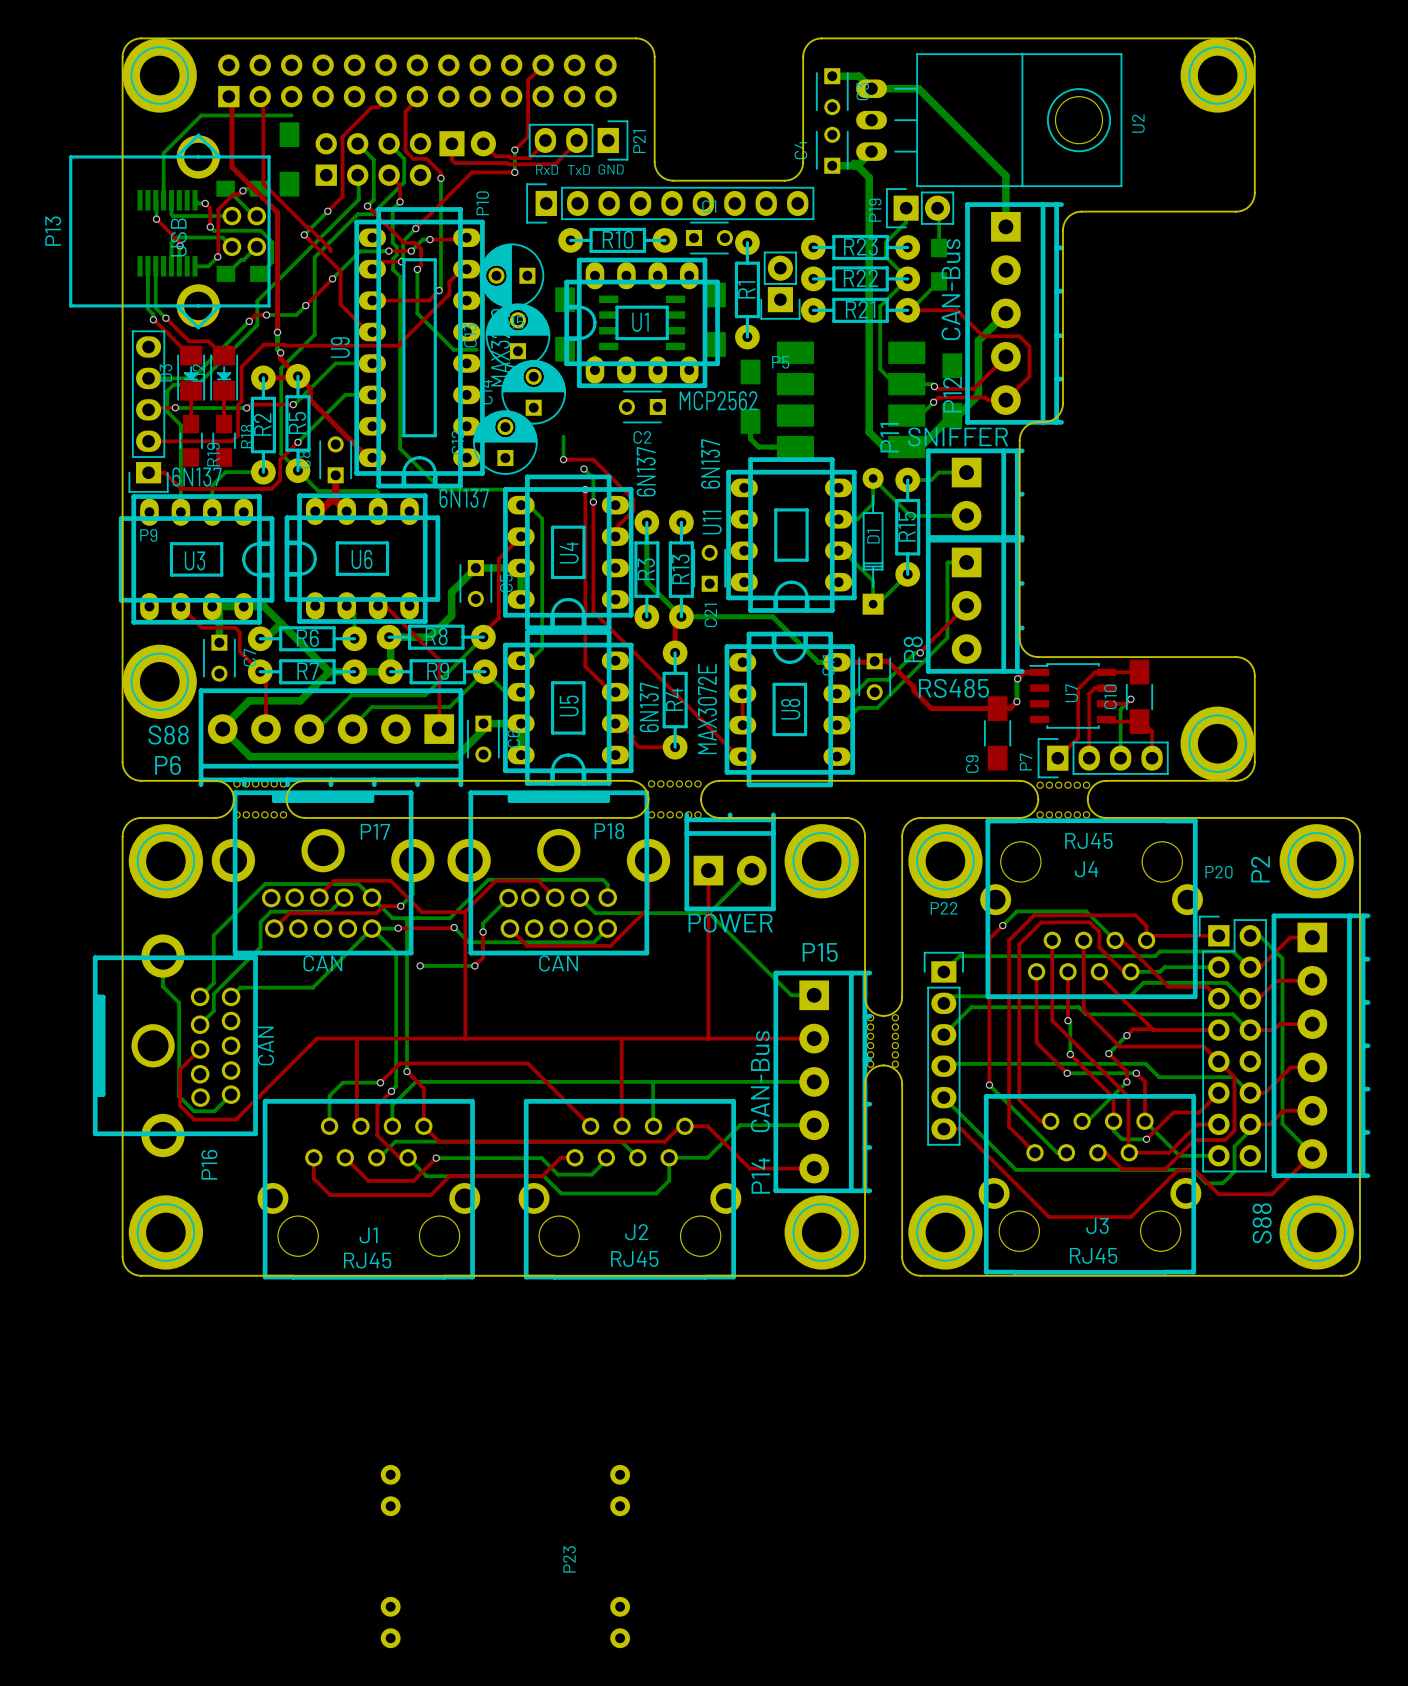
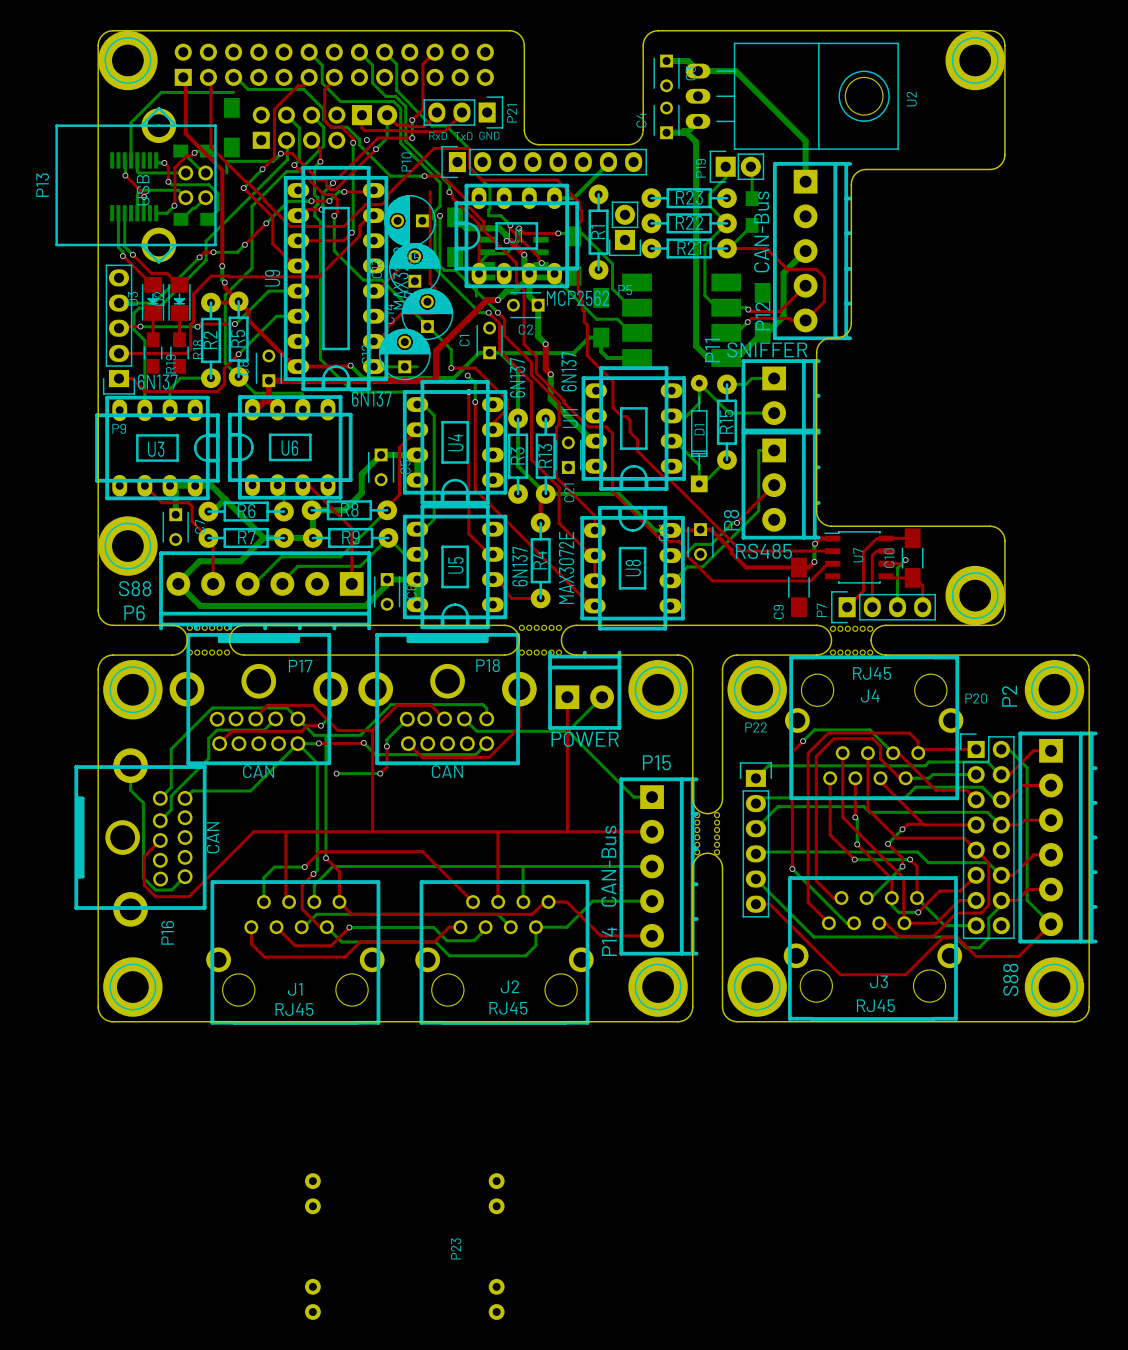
bottom track: none -> (309, 52) (322, 65) (322, 83) (340, 101) (393, 101) (400, 108) (400, 143) (440, 182) (440, 206) (433, 212) (435, 268) (479, 312) (488, 312)
bottom track: none -> (359, 52) (372, 65) (372, 83) (385, 96) (395, 96) (405, 106) (405, 141) (449, 184) (449, 192)
bottom track: none -> (384, 52) (396, 64) (396, 90) (431, 126) (446, 126) (469, 149) (469, 167) (489, 187) (488, 215) (500, 215) (510, 225)
bottom track: none -> (236, 77) (248, 89) (303, 89) (323, 109) (323, 119) (331, 127) (347, 127) (359, 139) (359, 145) (390, 176) (424, 176)
bottom track: none -> (387, 115) (387, 138) (375, 149)
via: none -> (366, 140)
P10 footprint: [526, 183, 815, 224] -> [441, 145, 647, 179]
top track: none -> (375, 149) (335, 189) (329, 189) (326, 186) (326, 179) (318, 179) (292, 153) (280, 153)
via: none -> (375, 149)
bottom track: none -> (280, 153) (273, 161) (227, 161) (226, 173)
via: none -> (280, 153)
bottom track: none -> (608, 162) (573, 198) (554, 198)
top track: none -> (424, 176) (442, 176) (468, 201) (468, 206) (484, 222) (484, 230) (516, 263) (516, 282) (524, 290) (524, 344) (536, 356) (536, 373) (588, 426) (605, 426) (612, 433) (612, 491) (662, 541) (678, 541) (684, 547) (684, 553) (712, 580) (810, 580) (827, 563)
via: none -> (424, 176)
C1 rotation: 0° (709, 238) -> 90° counterclockwise (489, 340)
C1 position: (709, 238) -> (489, 340)
top track: none -> (430, 191) (430, 283) (435, 288)
top track: none -> (449, 192) (479, 224) (479, 273)
via: none -> (449, 192)
R10: (617, 240) -> none
top track: none -> (264, 200) (290, 226) (343, 226) (365, 204) (381, 204) (388, 198) (388, 194) (433, 148) (468, 148) (469, 167) (482, 180) (557, 180) (579, 202) (579, 208) (581, 210) (581, 220) (578, 223) (578, 289) (584, 311) (584, 322) (587, 325) (587, 355) (612, 381) (612, 407) (621, 416) (626, 416) (630, 420) (630, 432) (637, 439) (637, 451) (663, 477) (667, 477) (741, 551) (832, 551)
bottom track: none -> (440, 215) (440, 266) (444, 270) (455, 270) (497, 312)
via: none -> (440, 215)
bottom track: none -> (455, 217) (466, 228) (499, 228) (506, 235) (506, 240)
top track: none -> (510, 225) (510, 228) (538, 257) (541, 262)
via: none -> (510, 225)
bottom track: none -> (519, 228) (519, 240) (506, 253) (488, 253) (479, 263) (479, 273)
top track: none -> (519, 228) (524, 233) (558, 233)
via: none -> (519, 228)
bottom track: none -> (558, 233) (581, 233) (612, 264) (612, 289) (631, 307)
via: none -> (558, 233)
top track: none -> (506, 240) (510, 240) (524, 254)
via: none -> (506, 240)
bottom track: none -> (524, 254) (524, 268) (529, 273) (529, 296) (538, 305) (538, 336) (545, 344)
via: none -> (524, 254)
U1 position: (642, 322) -> (516, 235)
part position: (565, 324) -> (455, 237)
top track: none -> (414, 262) (405, 262) (377, 291)
bottom track: none -> (541, 262) (554, 273) (554, 277) (596, 319) (617, 319) (631, 332)
via: none -> (541, 262)
bottom track: none -> (529, 277) (514, 291) (506, 291) (497, 300)
bottom track: none -> (381, 280) (451, 349)
top track: none -> (497, 300) (486, 300) (436, 350) (436, 377) (432, 381) (268, 380)
via: none -> (497, 300)
top track: none -> (488, 312) (499, 323) (499, 350) (531, 382) (531, 459) (559, 487) (559, 523) (591, 555)
via: none -> (488, 312)
top track: none -> (497, 312) (504, 319) (504, 335) (531, 362) (531, 375) (559, 402) (559, 424) (556, 427) (556, 477) (594, 515) (594, 530)
via: none -> (497, 312)
top track: none -> (435, 313) (402, 313) (377, 341)
C2 position: (642, 406) -> (525, 305)
bottom track: none -> (601, 337) (589, 337) (573, 353) (500, 353)
top track: none -> (545, 344) (545, 369) (550, 374)
via: none -> (545, 344)
bottom track: none -> (350, 365) (363, 378) (453, 378) (479, 352) (500, 352) (518, 370) (518, 418)
top track: none -> (350, 365) (298, 366)
via: none -> (350, 365)
bottom track: none -> (374, 366) (417, 366)
bottom track: none -> (550, 374) (550, 399) (592, 441)
via: none -> (550, 374)

